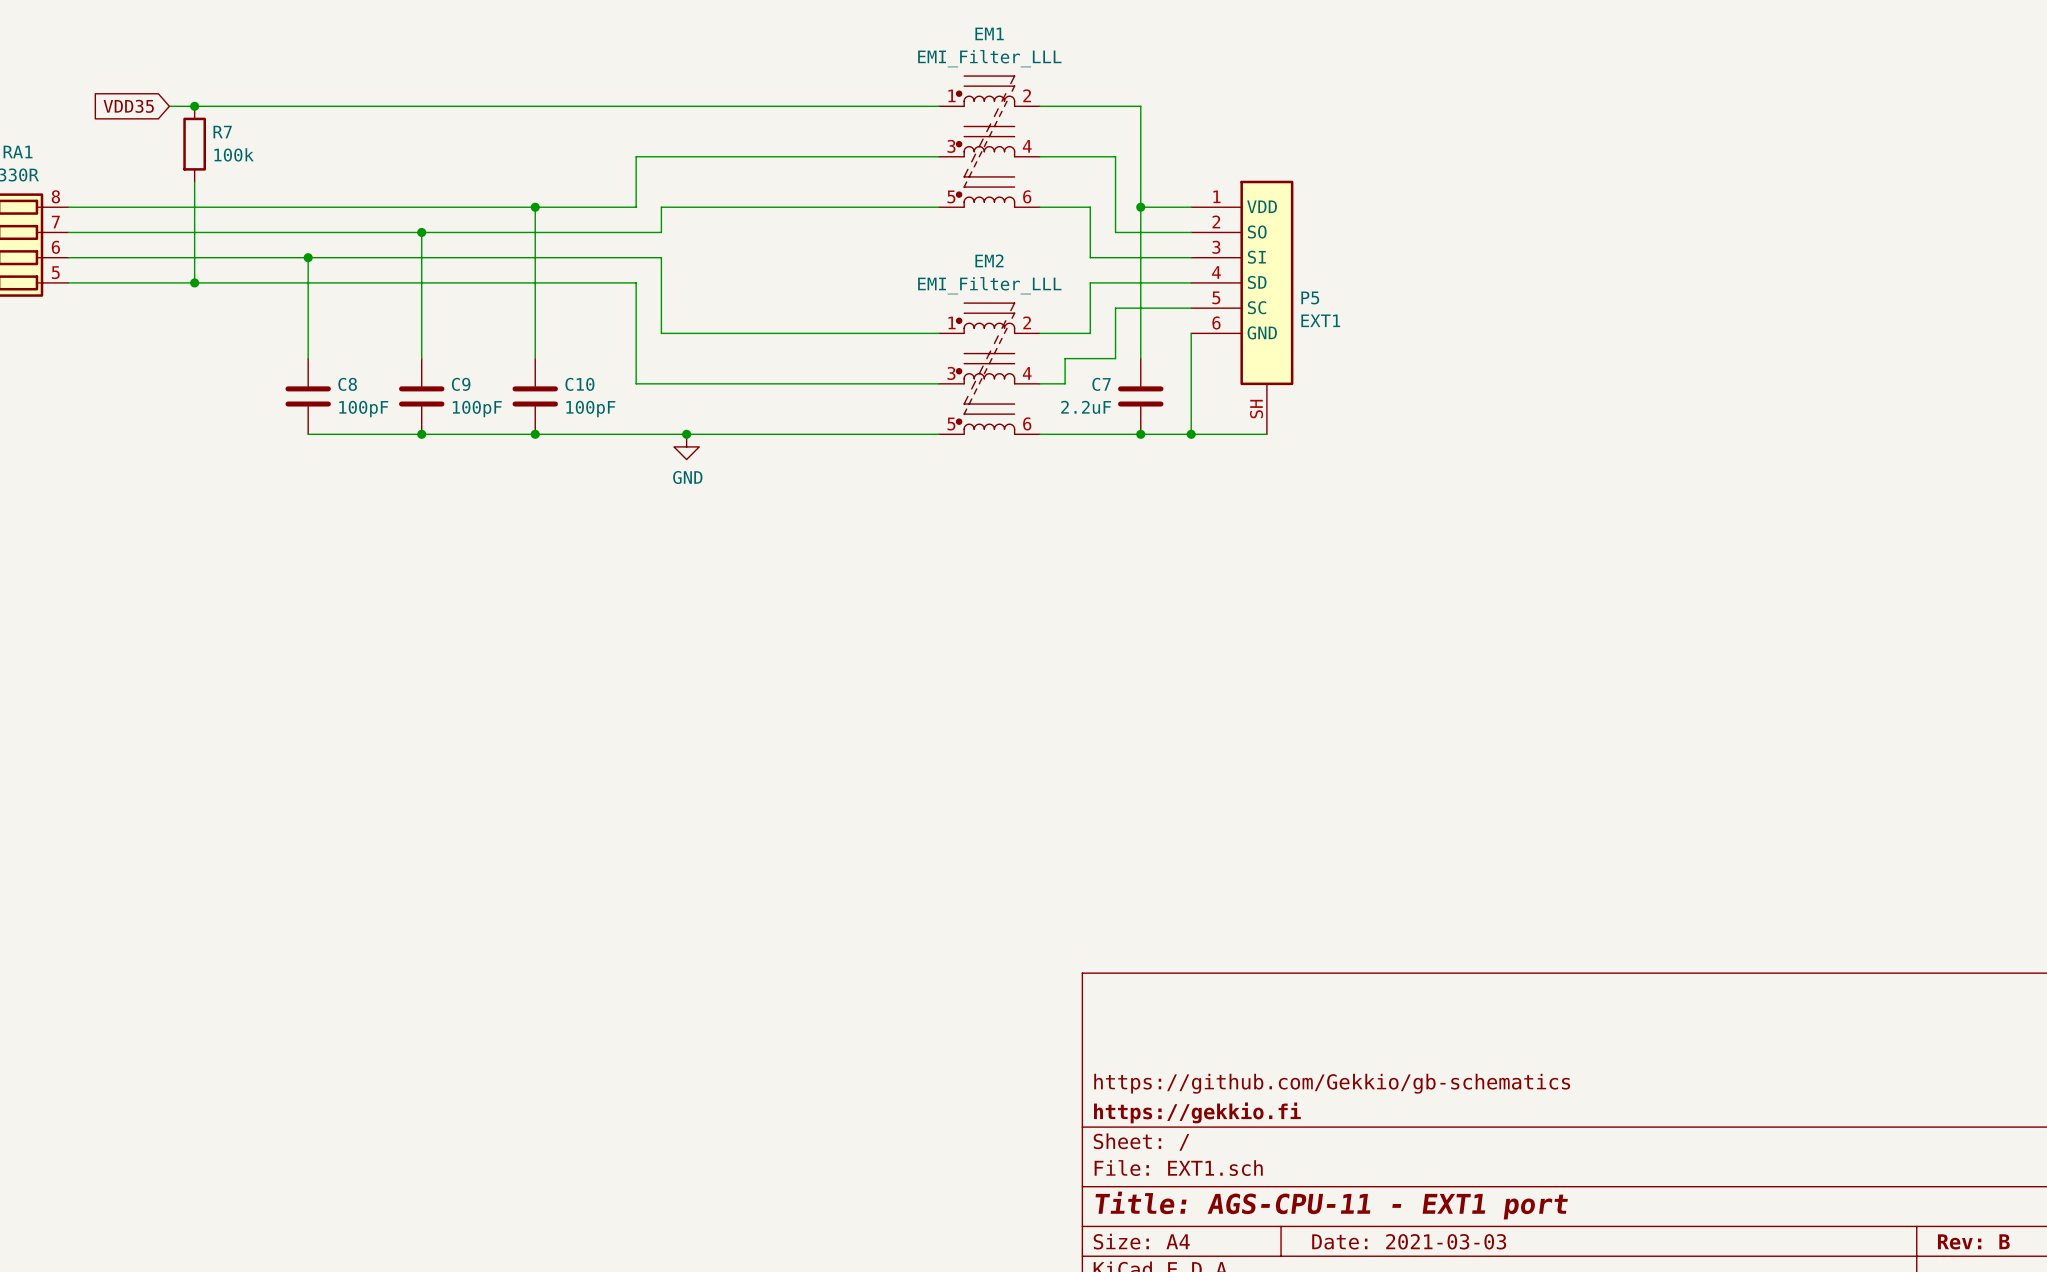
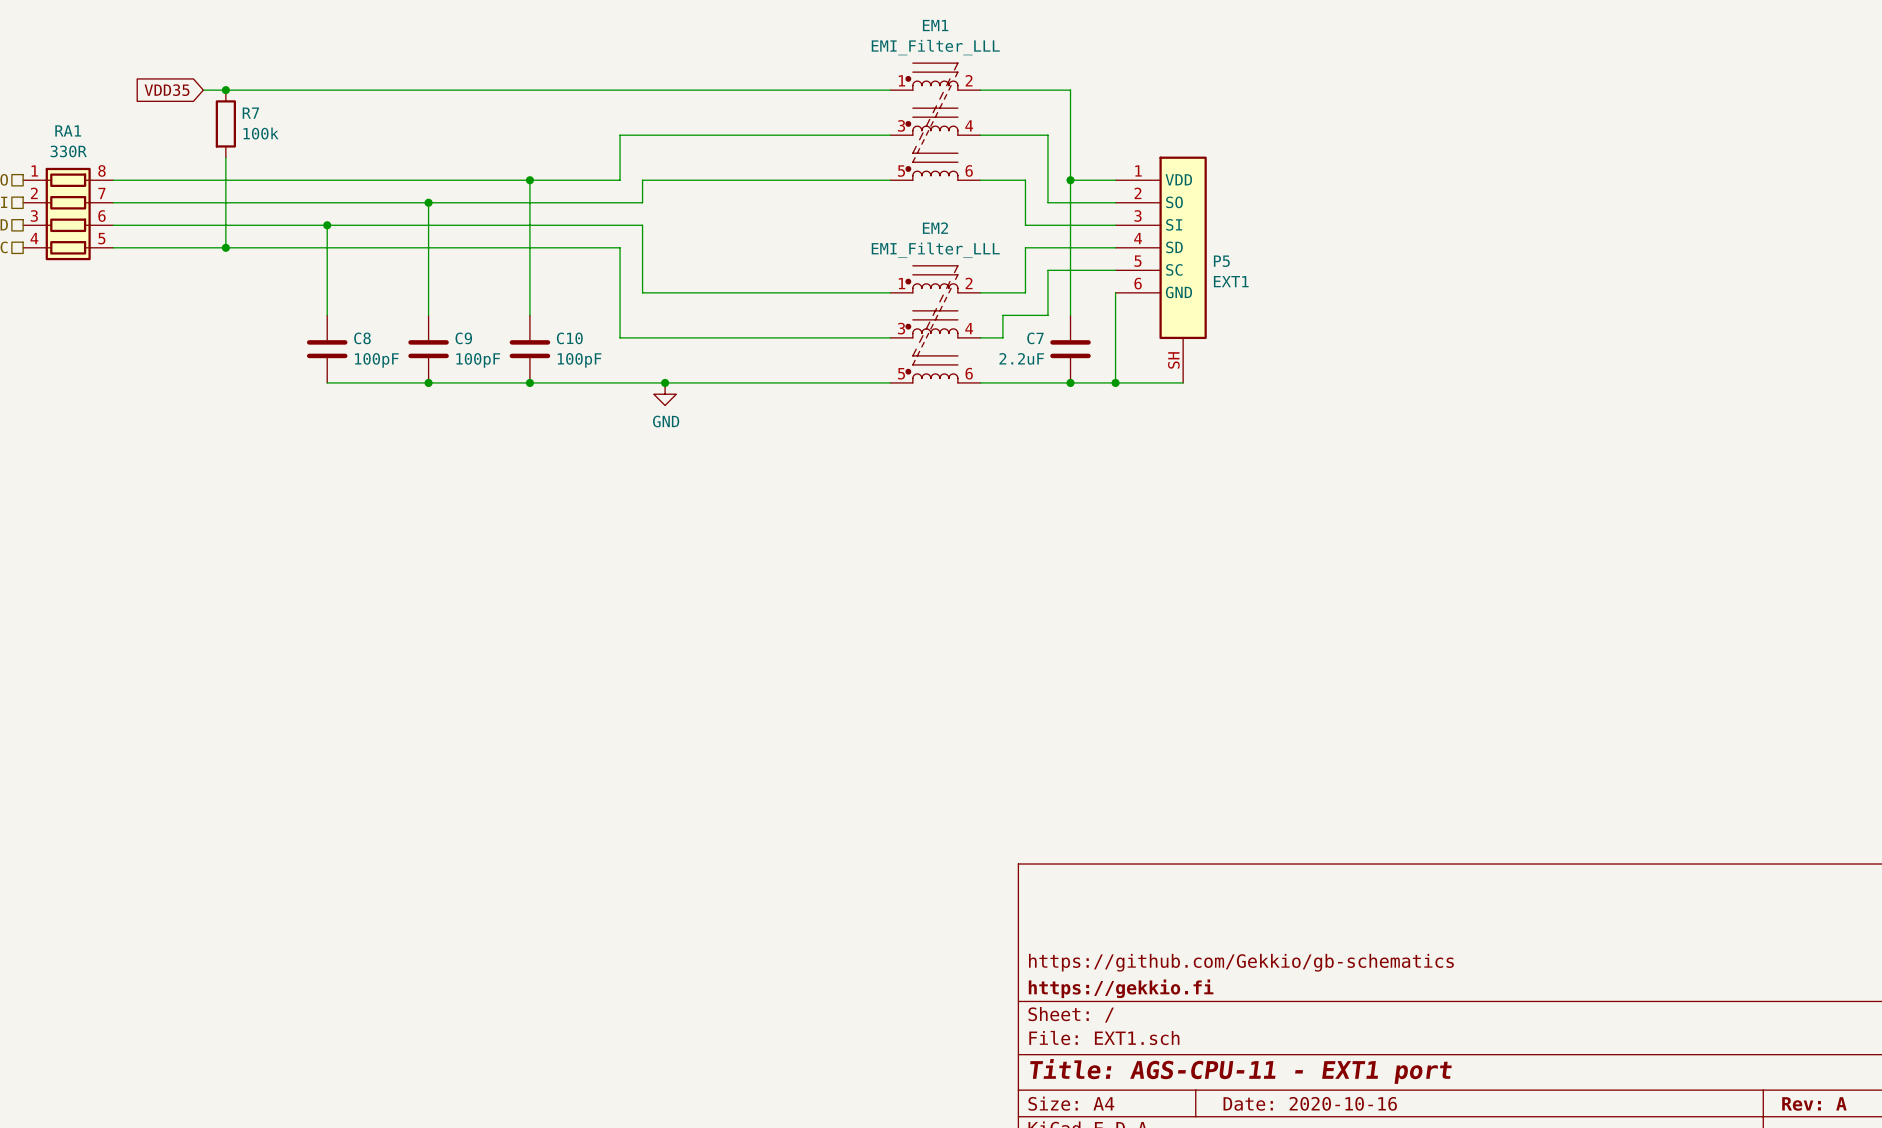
title block: Date: 2021-03-03 (1409, 1241) -> Date: 2020-10-16 (1310, 1103)
title block: Rev: B (1973, 1241) -> Rev: A (1814, 1103)

